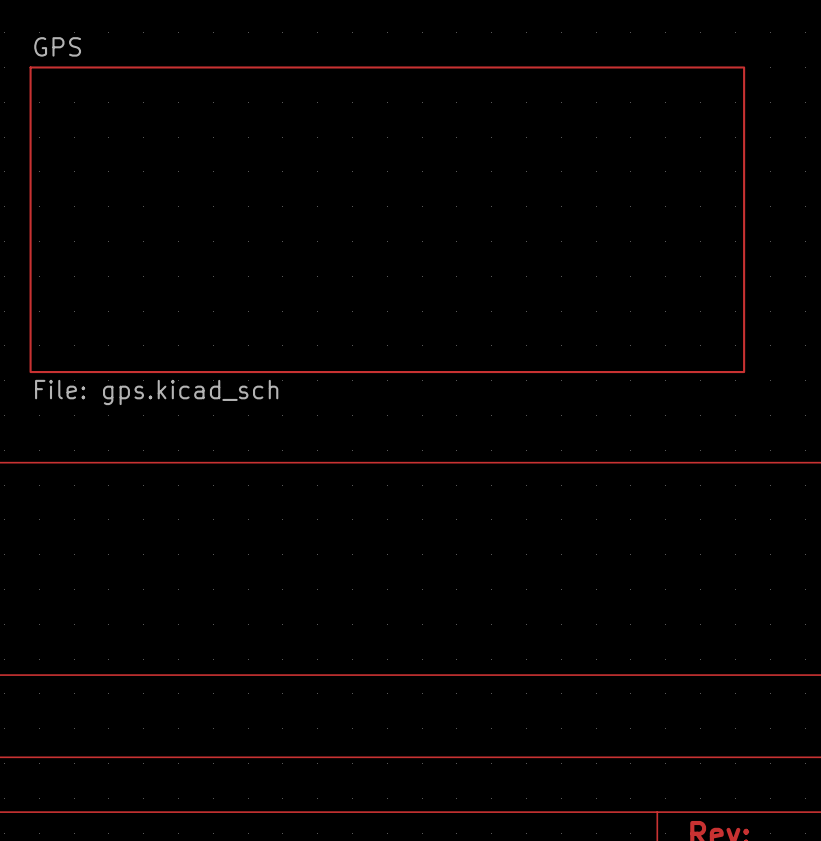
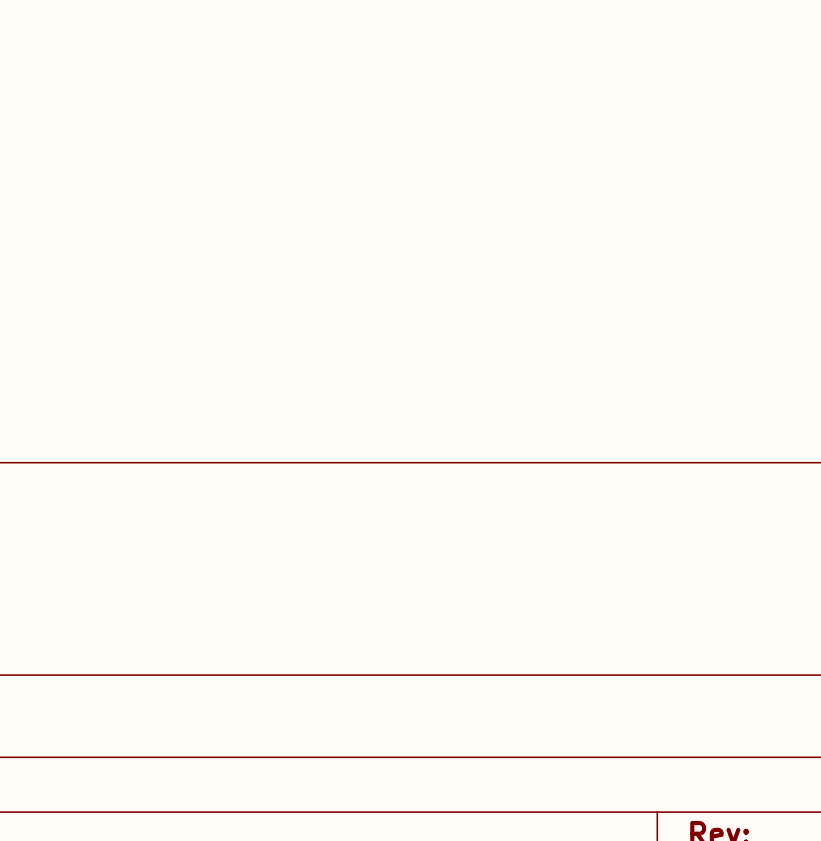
sheet GPS: File: gps.kicad_sch (387, 219) -> none

